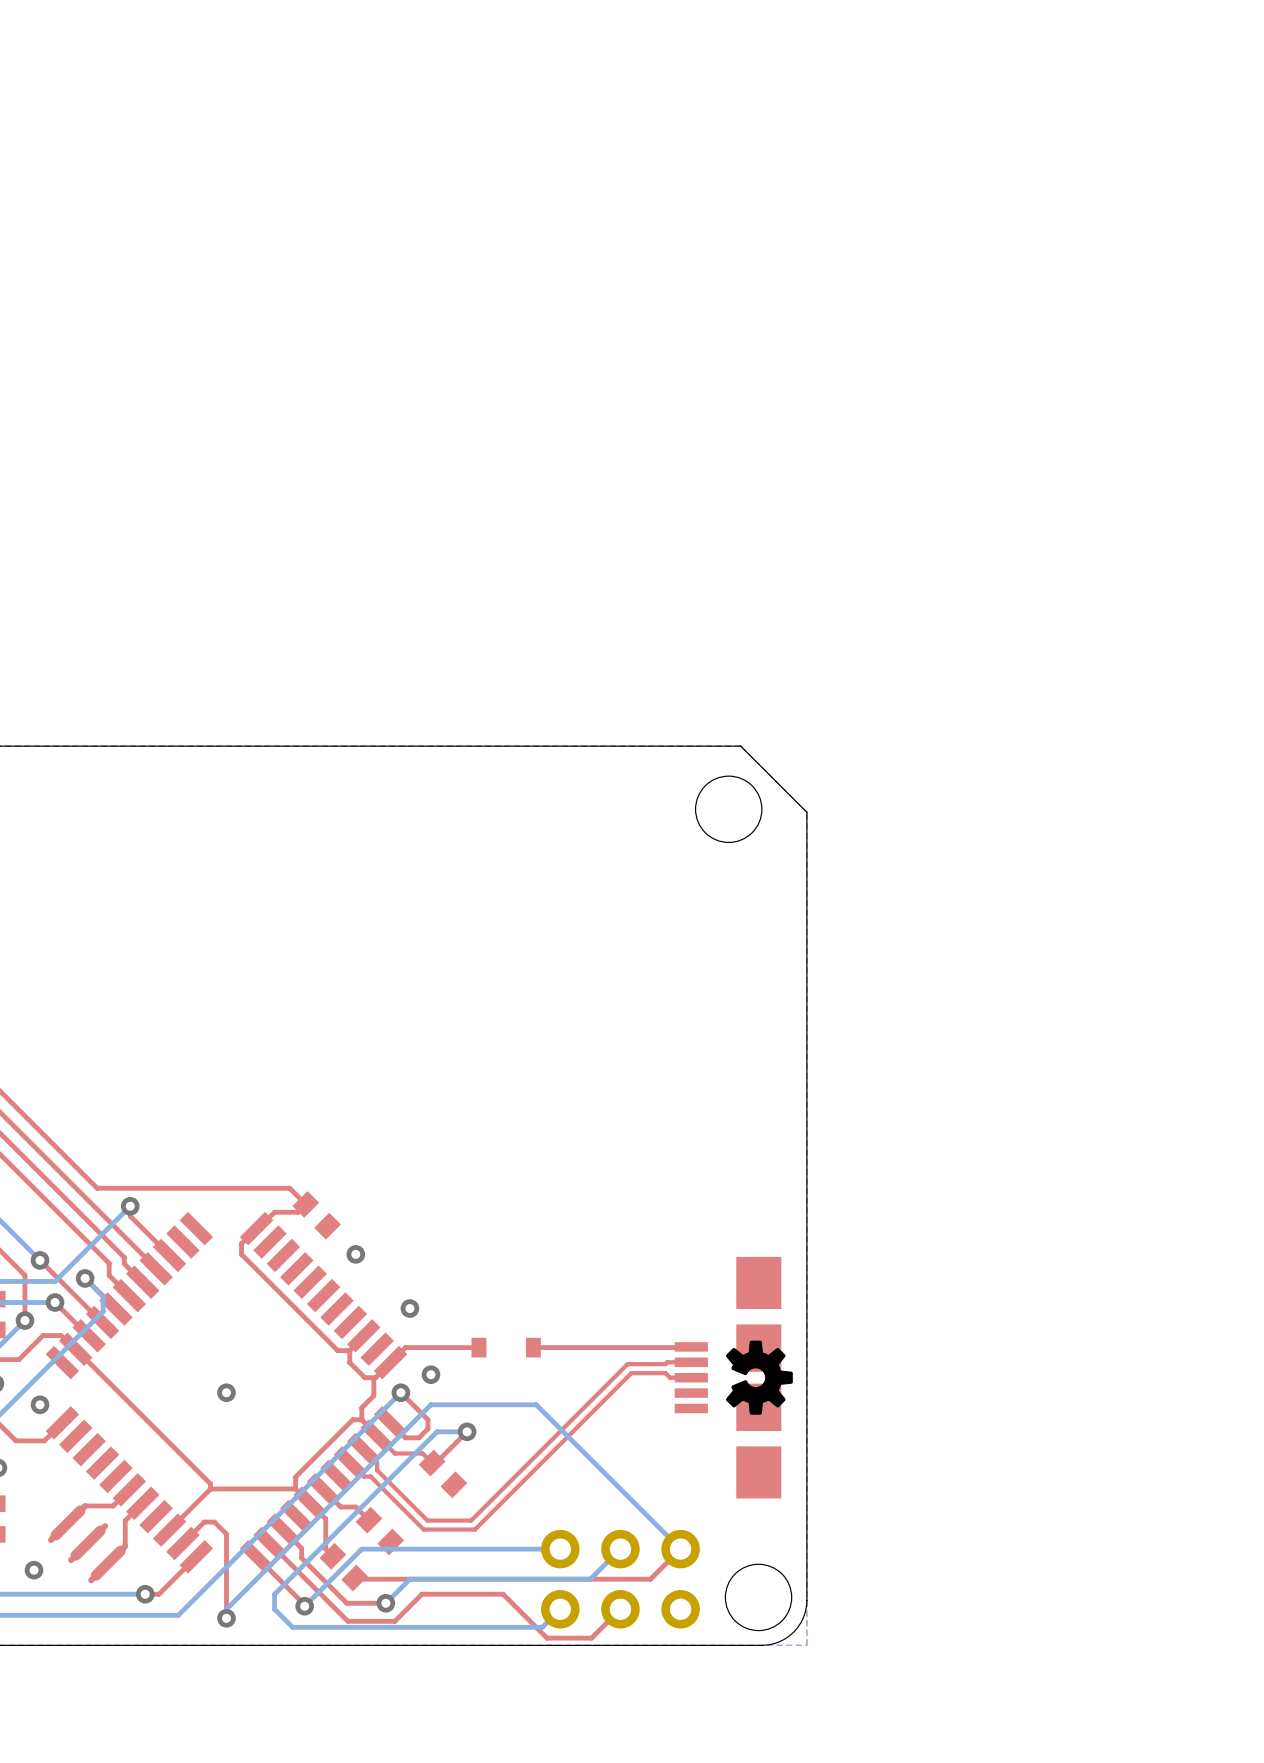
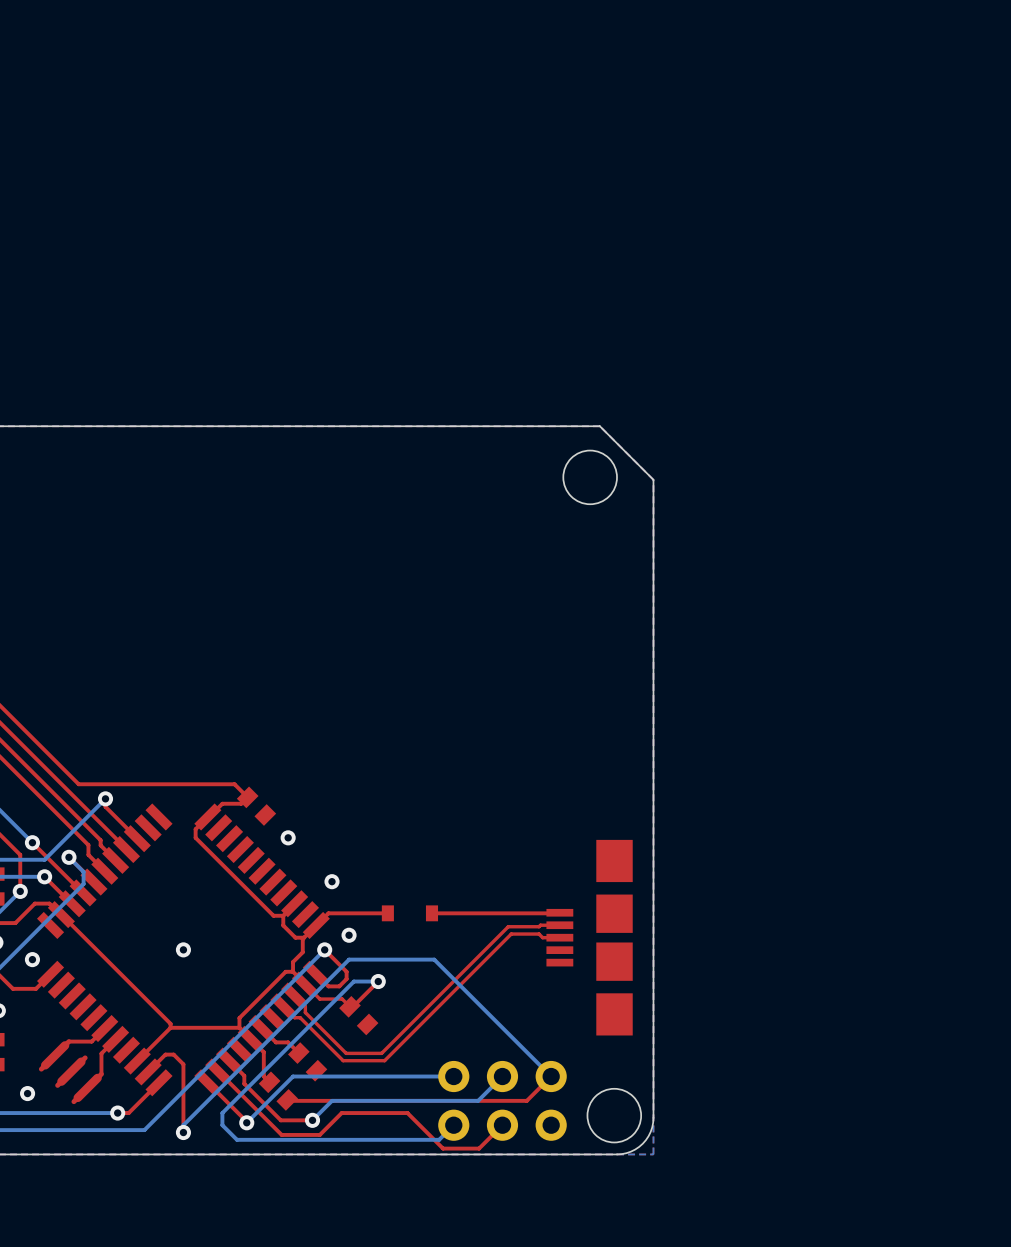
drawing: [726, 1340, 793, 1415] -> none

